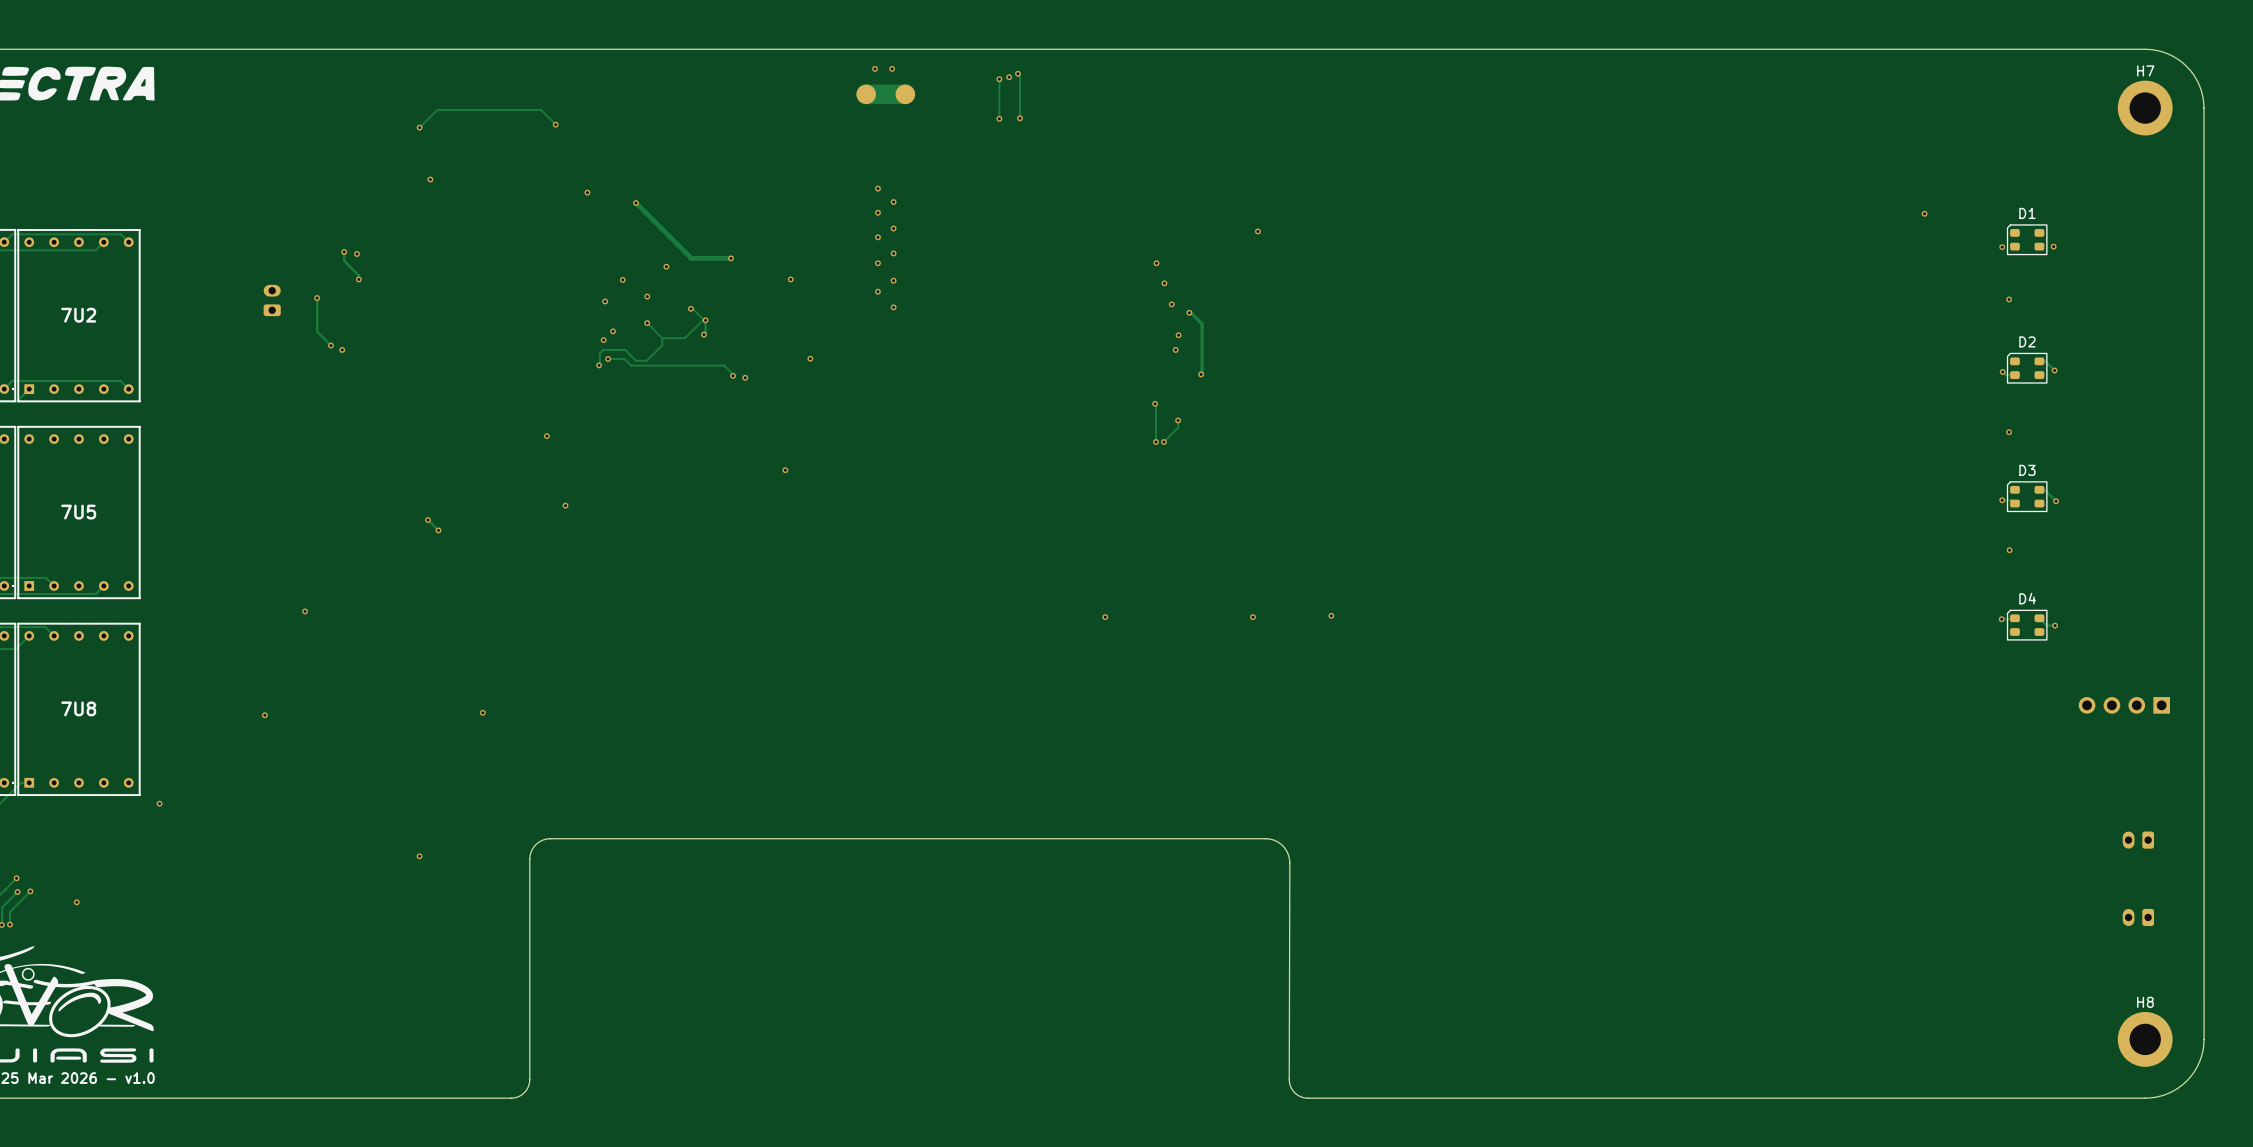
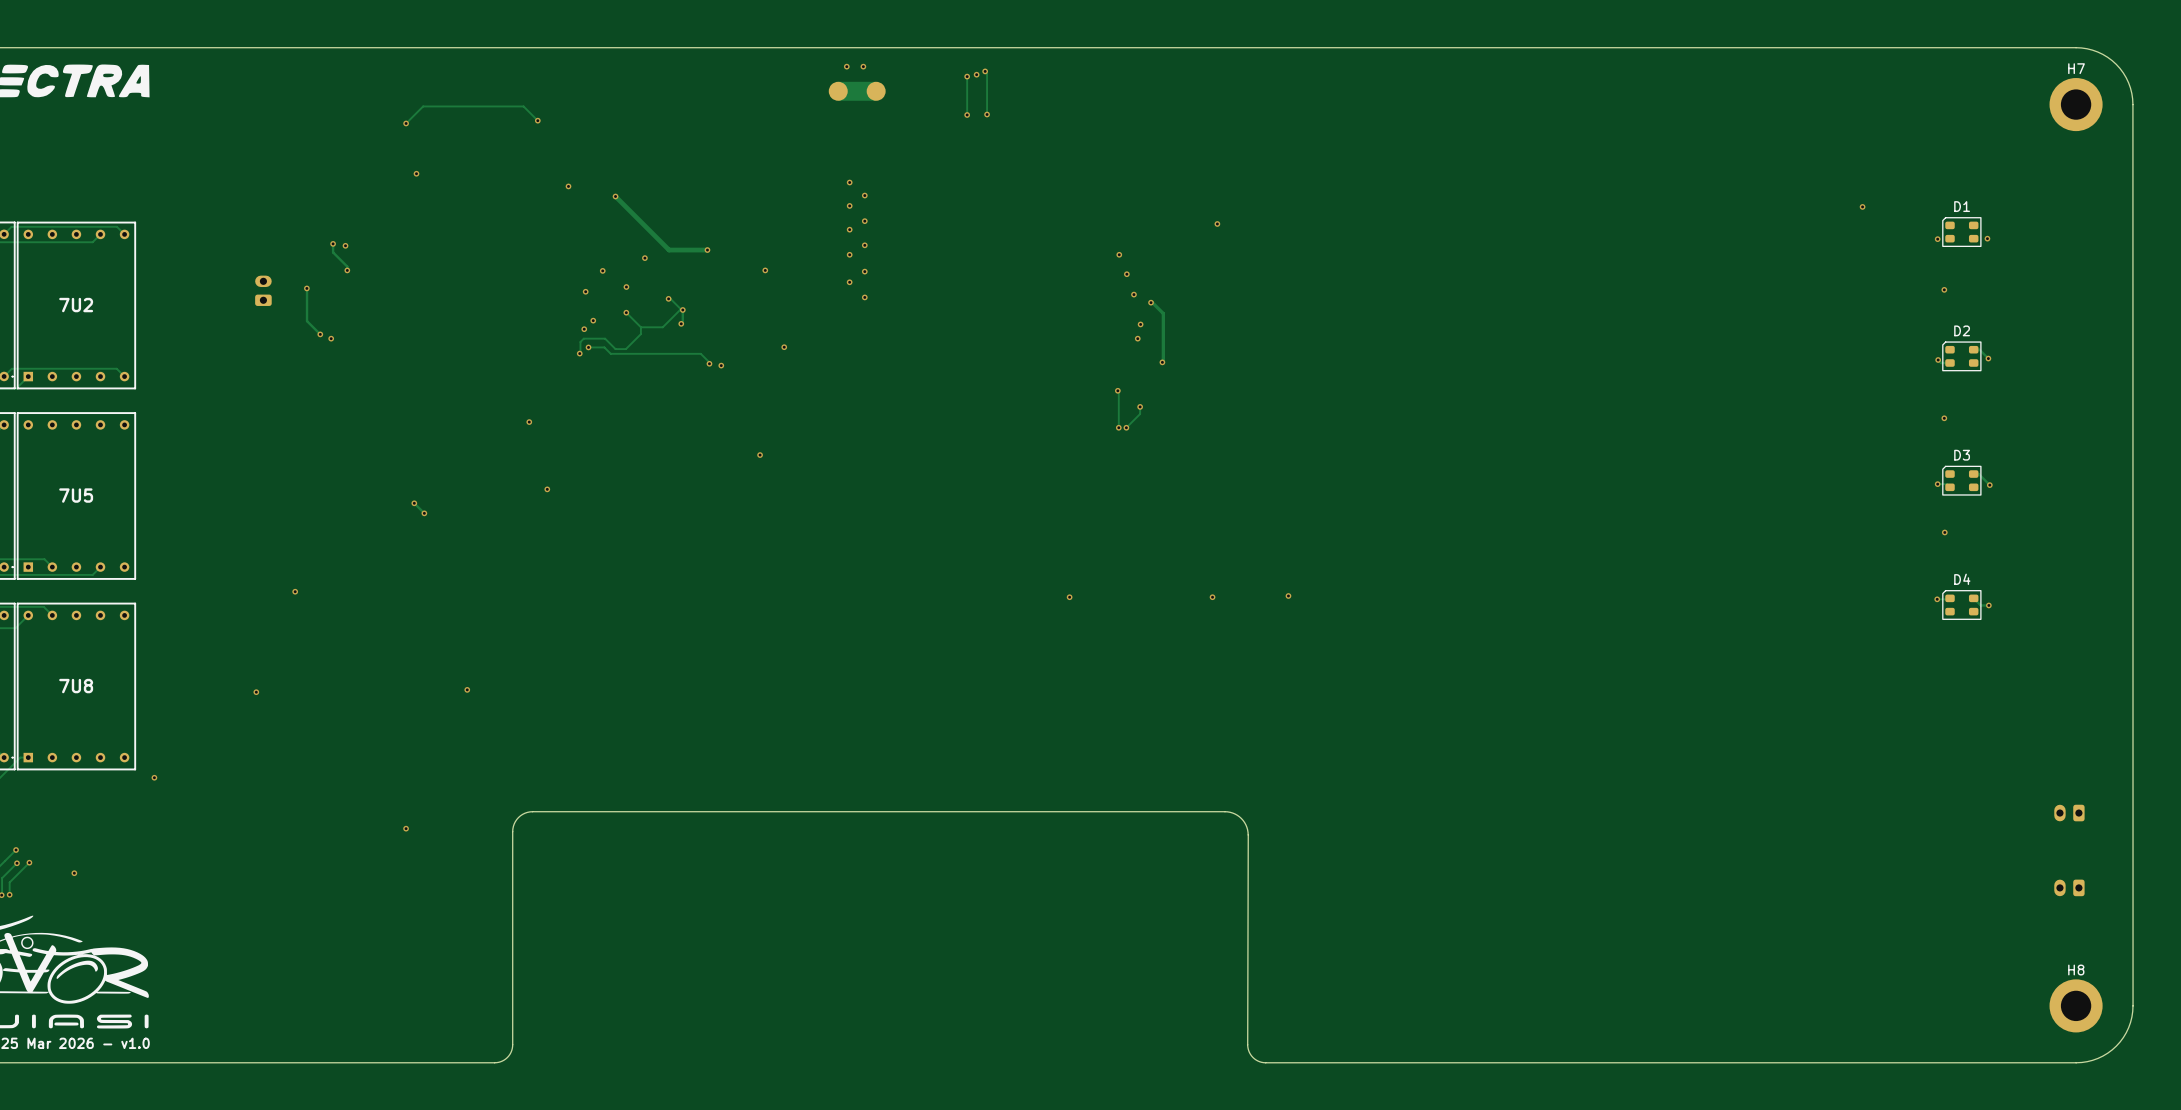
part: (2124, 705) -> none

